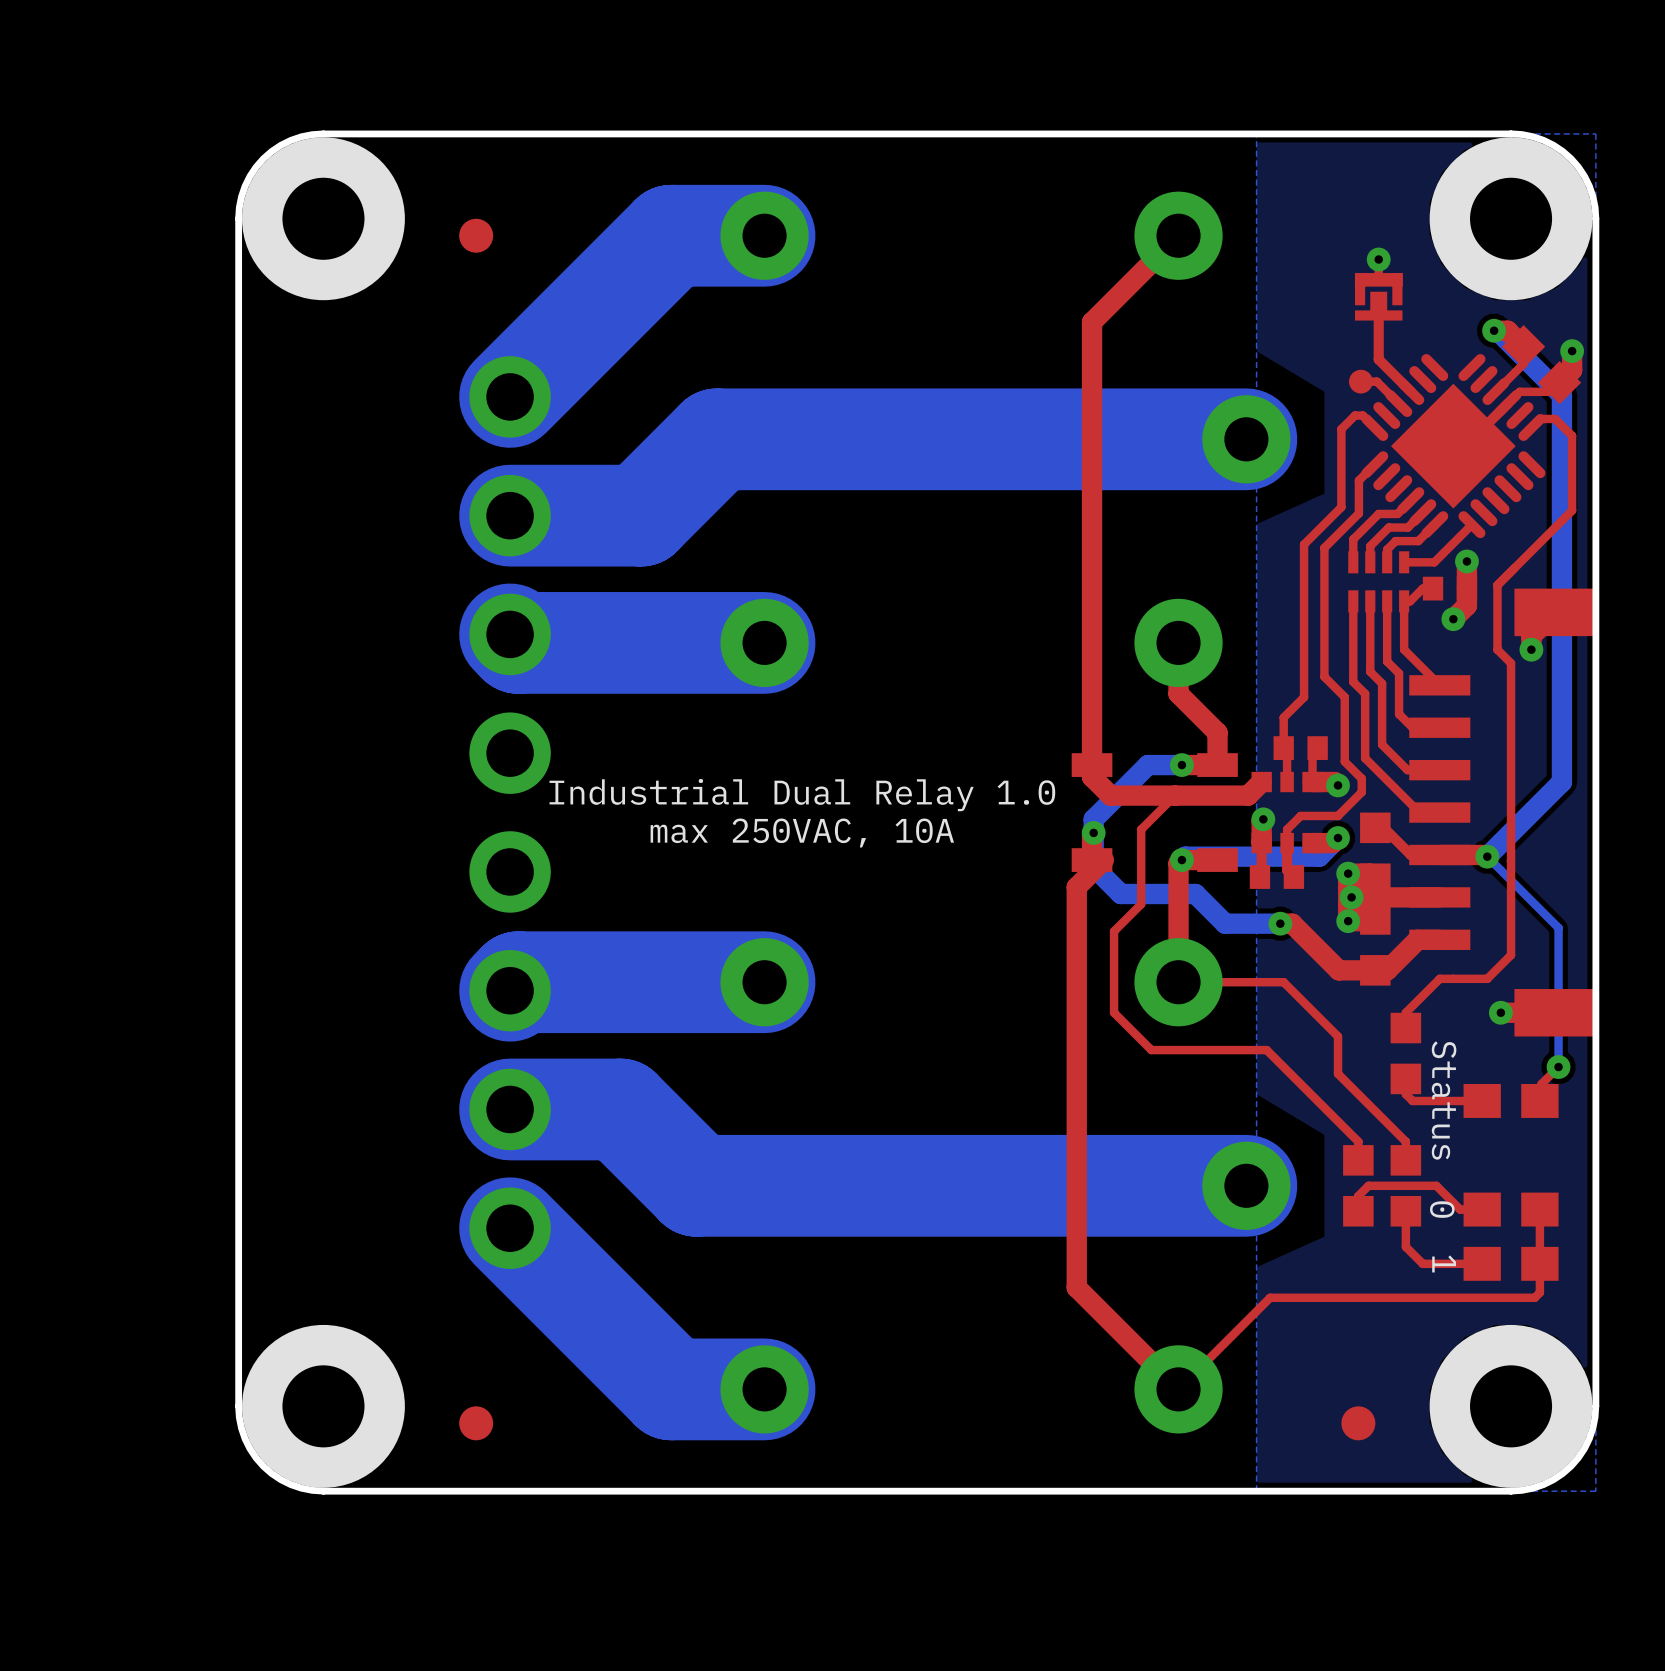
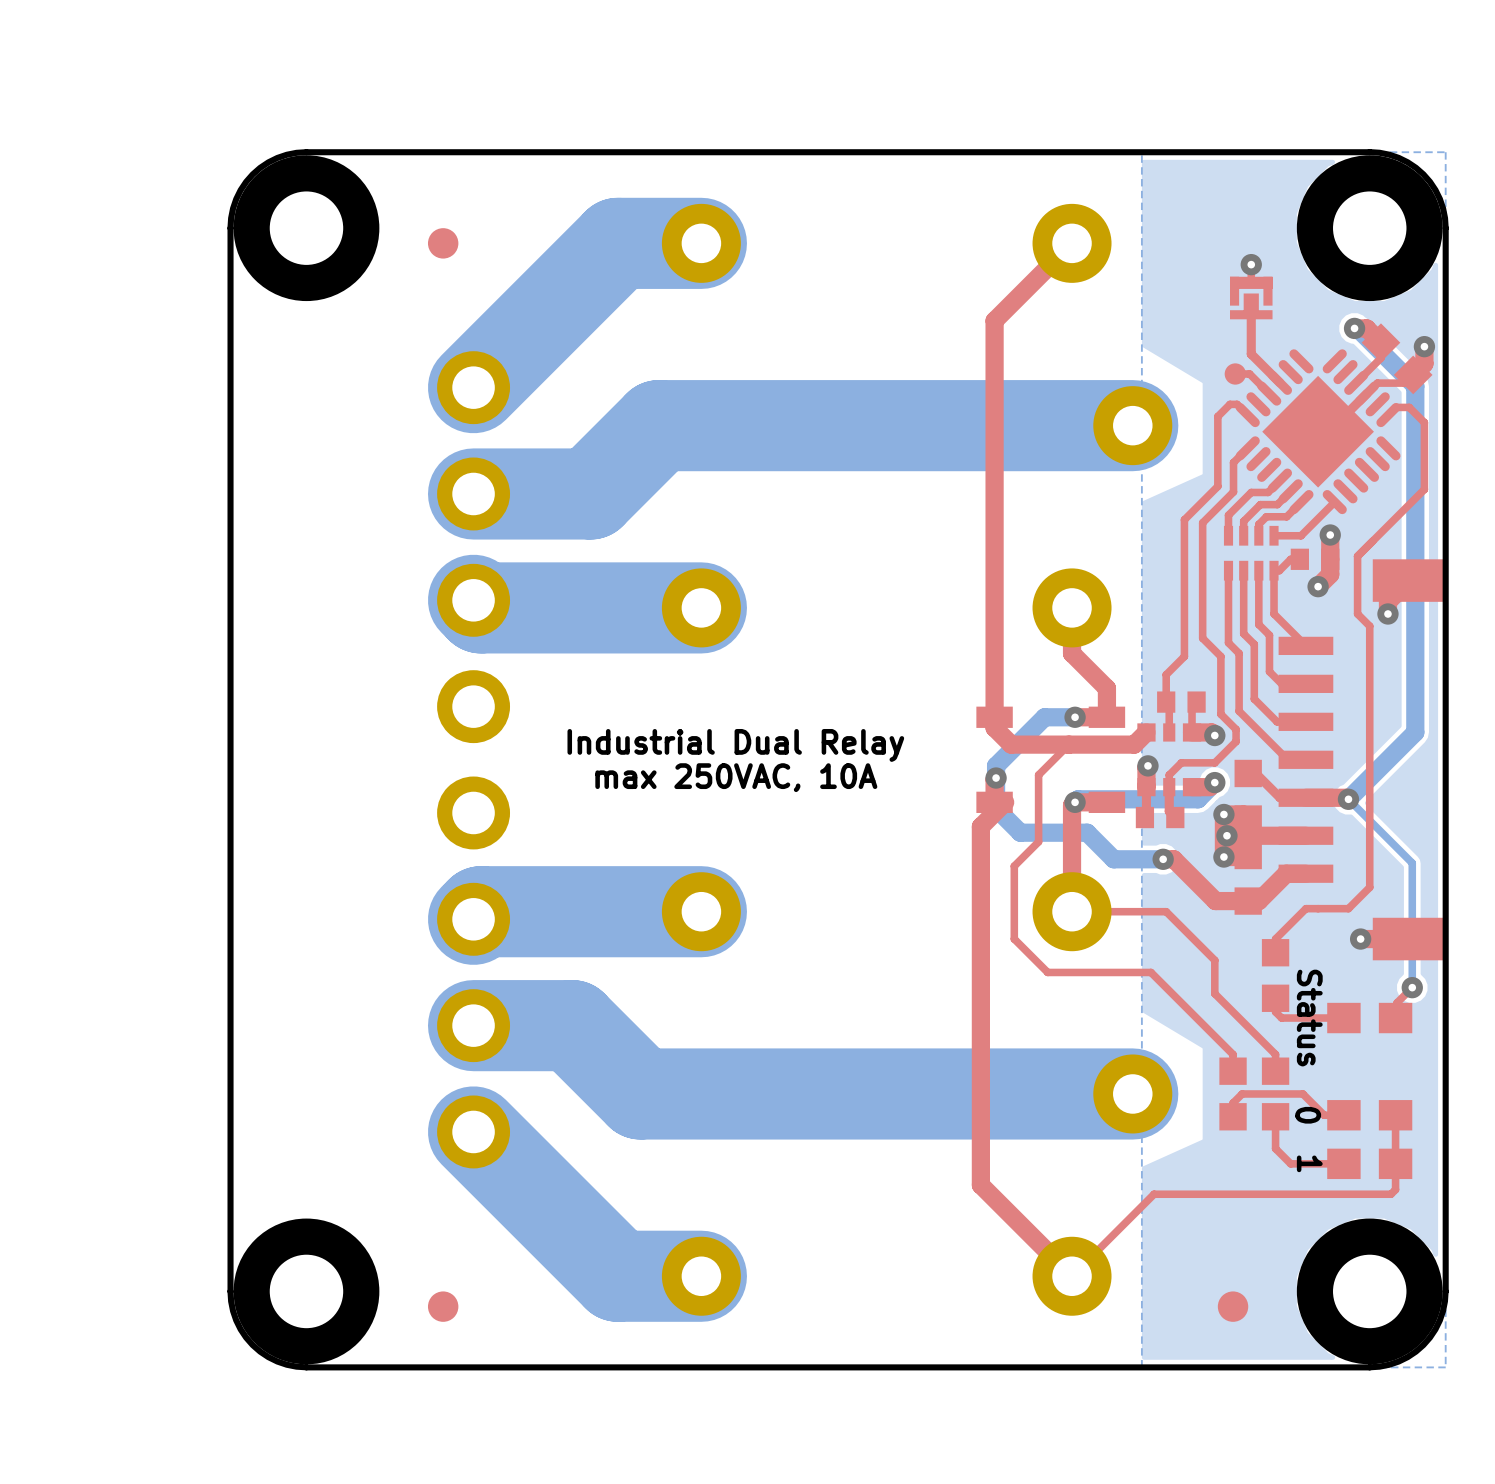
text: Industrial Dual Relay 1.0 (802, 795) -> Industrial Dual Relay (735, 745)

